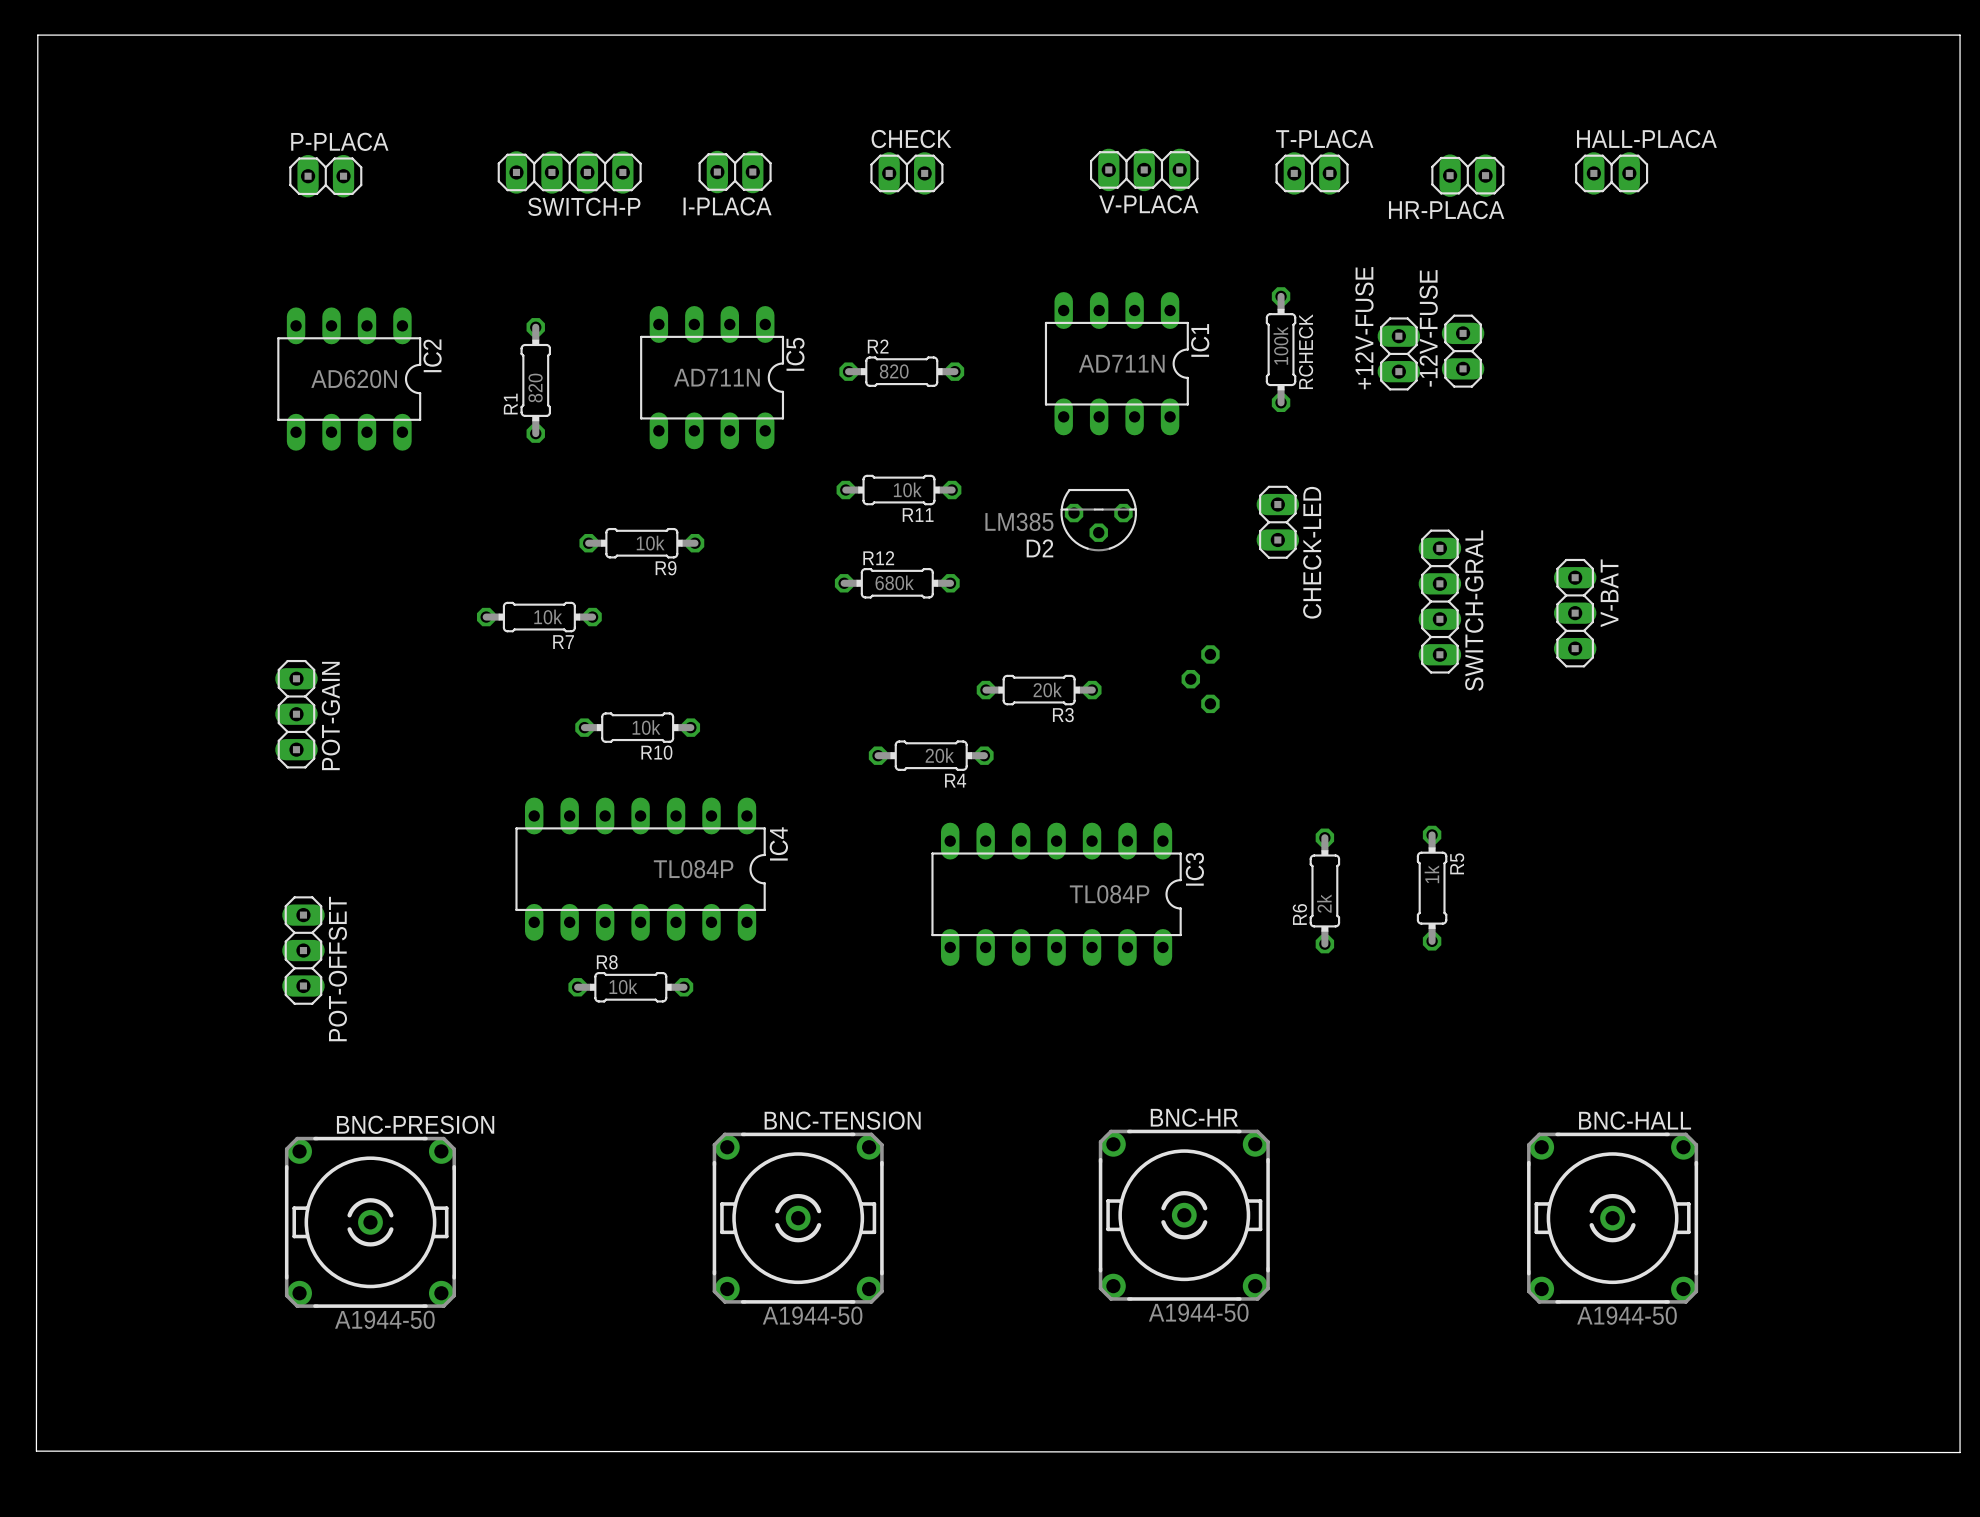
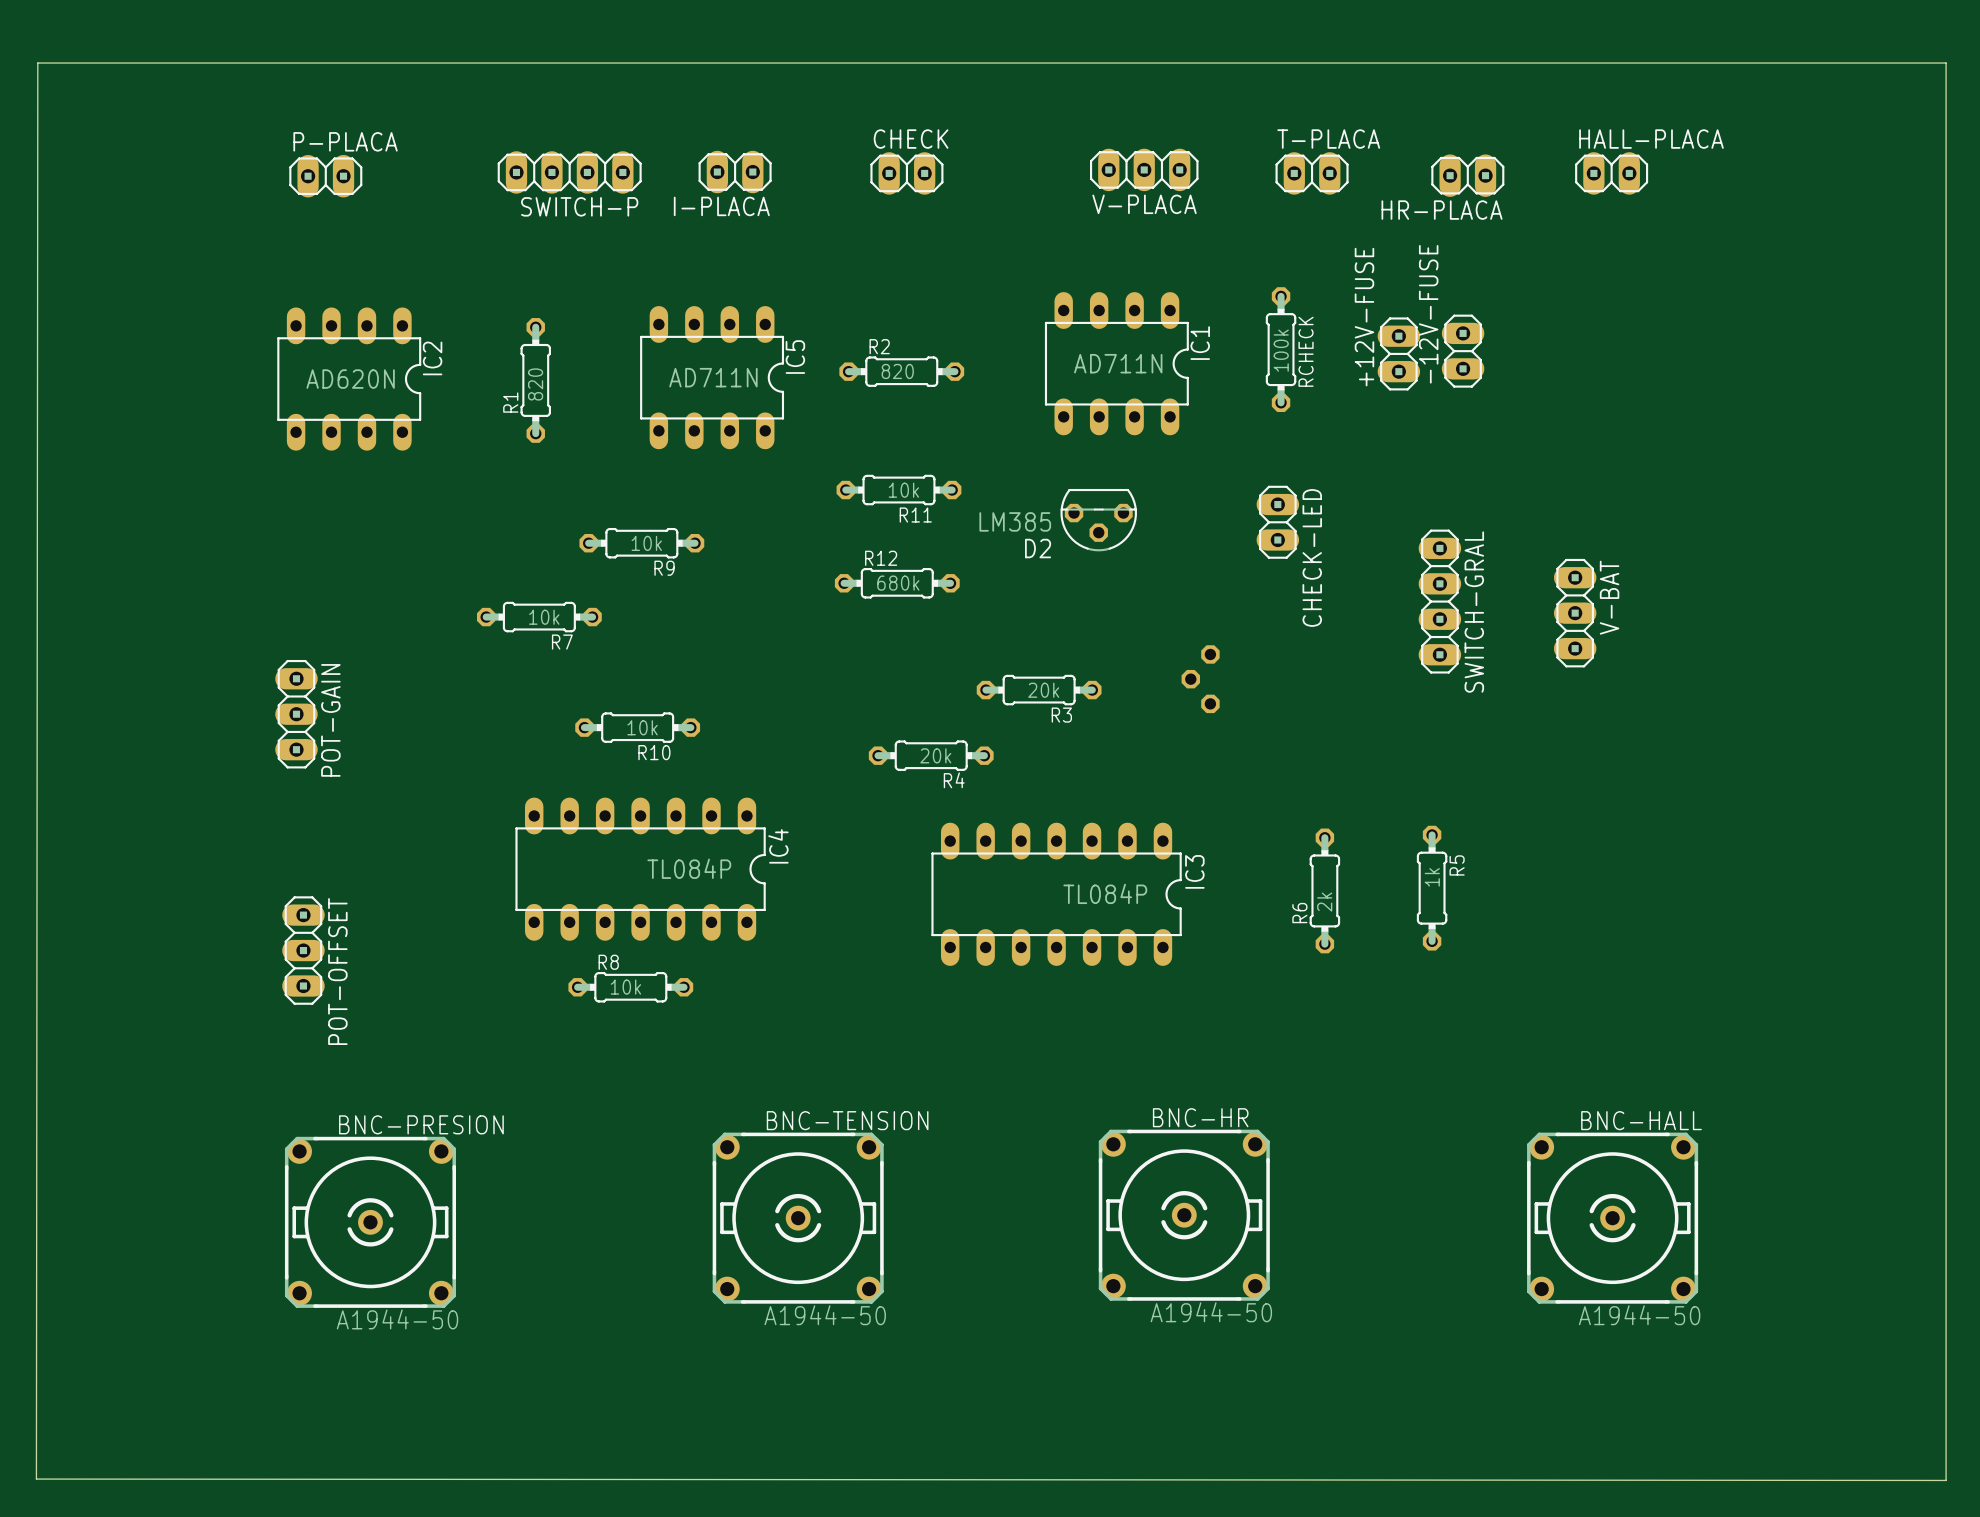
board edge: (37, 63) (37, 35) (1960, 35) (1960, 1452) (36, 1451) -> (37, 63) (1946, 63) (1946, 1480) (36, 1479) (36, 1451)

